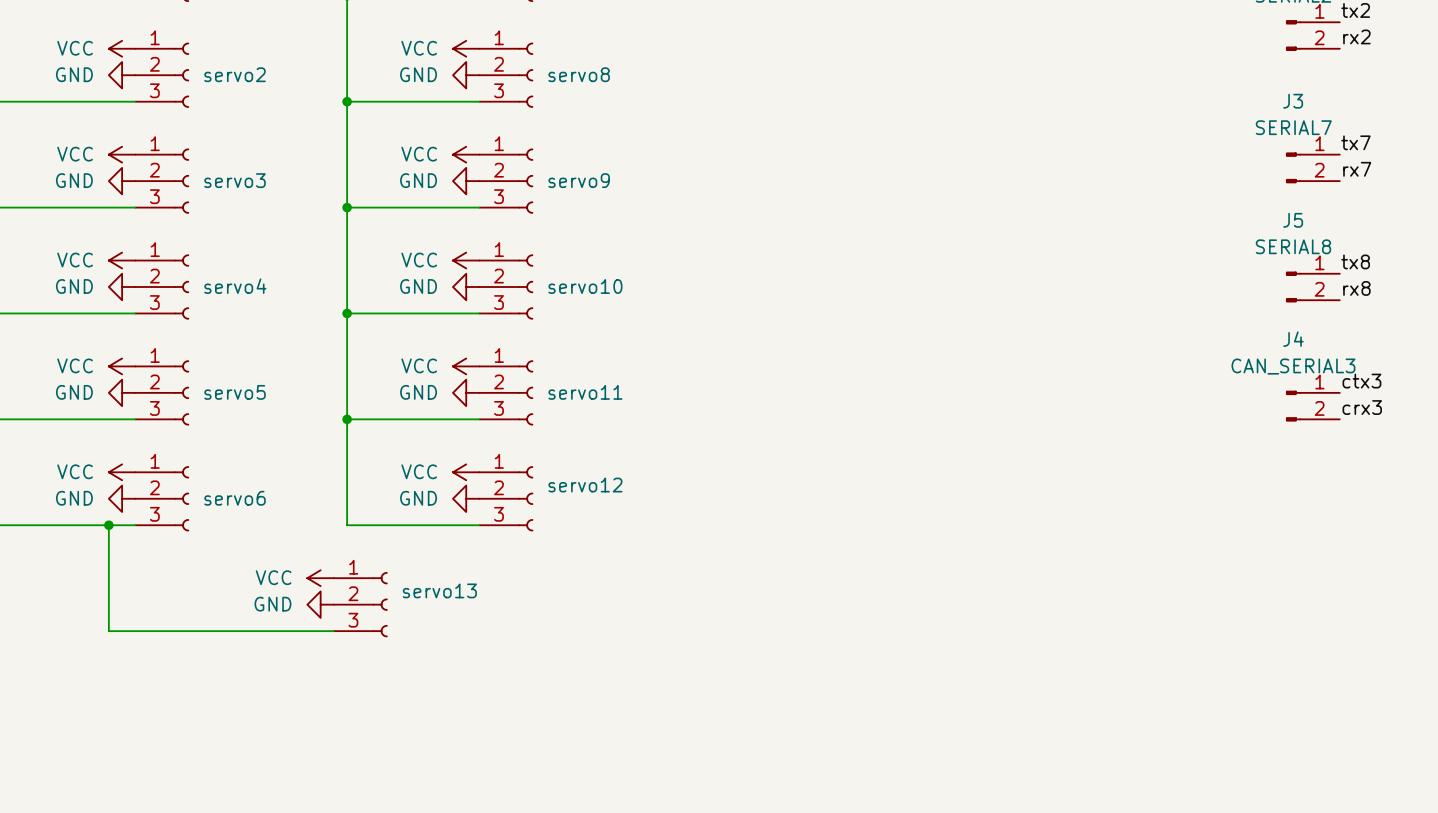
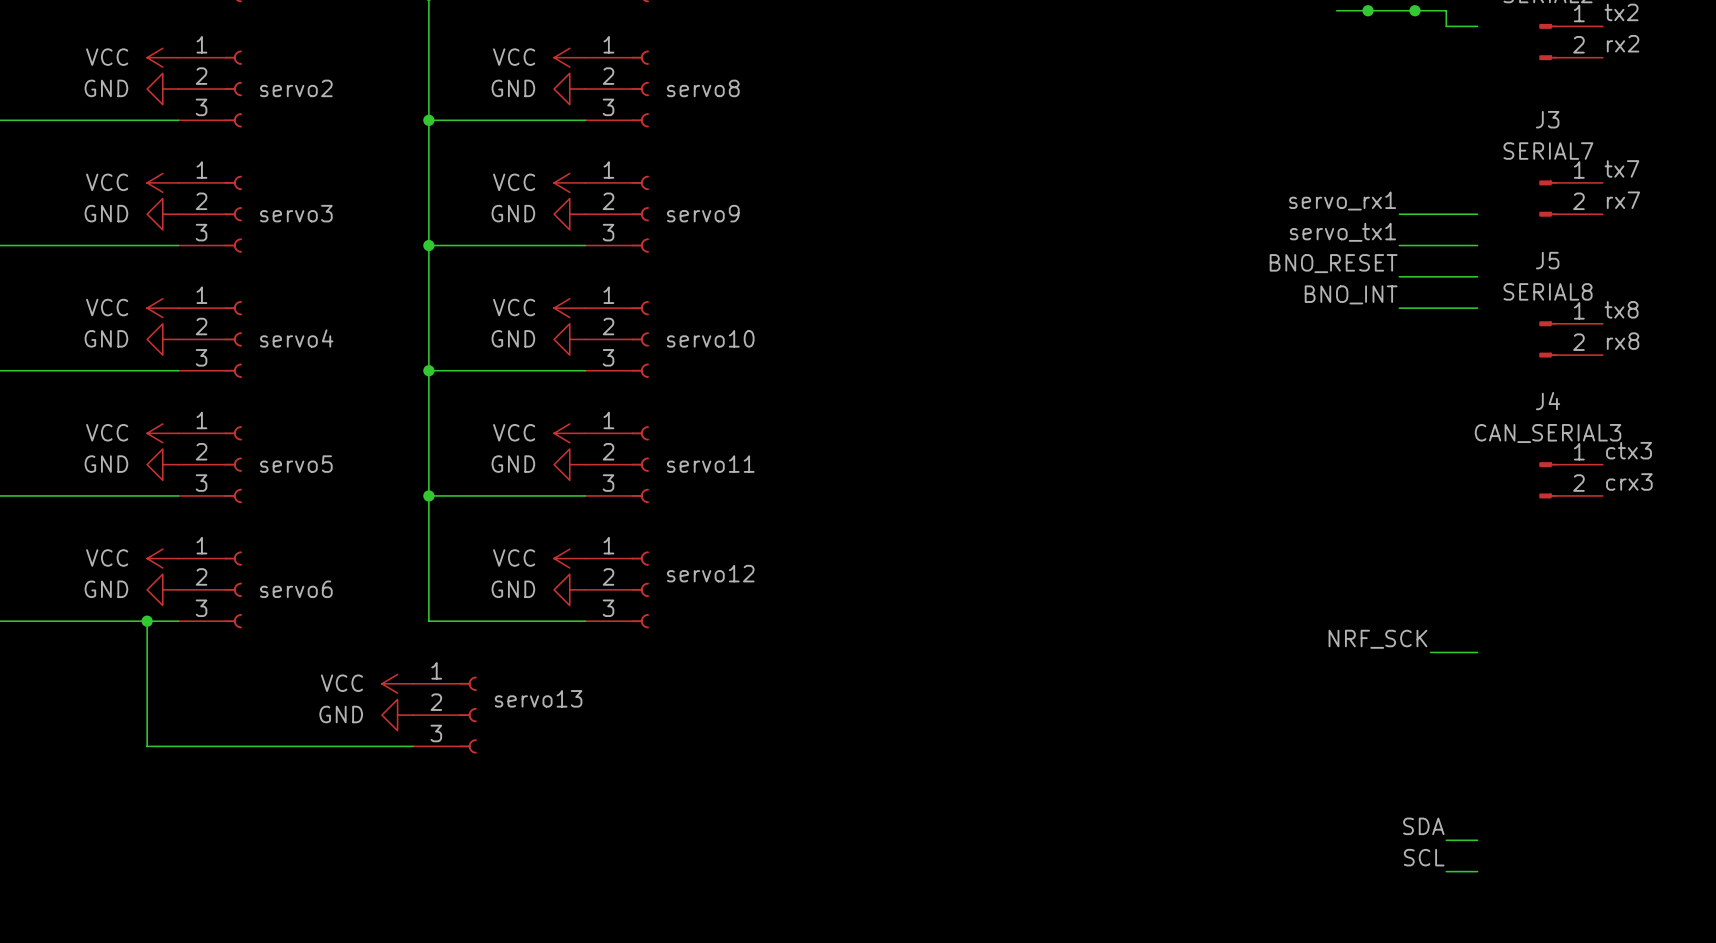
wire: none -> (1336, 10) (1446, 10) (1446, 26) (1477, 26)
junction: none -> (1368, 10)
junction: none -> (1414, 10)
label: none -> servo_rx1 (1342, 200)
wire: none -> (1399, 214) (1477, 214)
label: none -> servo_tx1 (1342, 232)
wire: none -> (1399, 245) (1477, 245)
label: none -> BNO_RESET (1333, 263)
wire: none -> (1399, 276) (1477, 276)
label: none -> BNO_INT (1351, 294)
wire: none -> (1399, 308) (1477, 308)
label: none -> NRF_SCK (1377, 639)
wire: none -> (1430, 652) (1477, 652)
label: none -> SDA (1423, 826)
wire: none -> (1446, 840) (1477, 840)
label: none -> SCL (1424, 857)
wire: none -> (1446, 871) (1477, 871)

